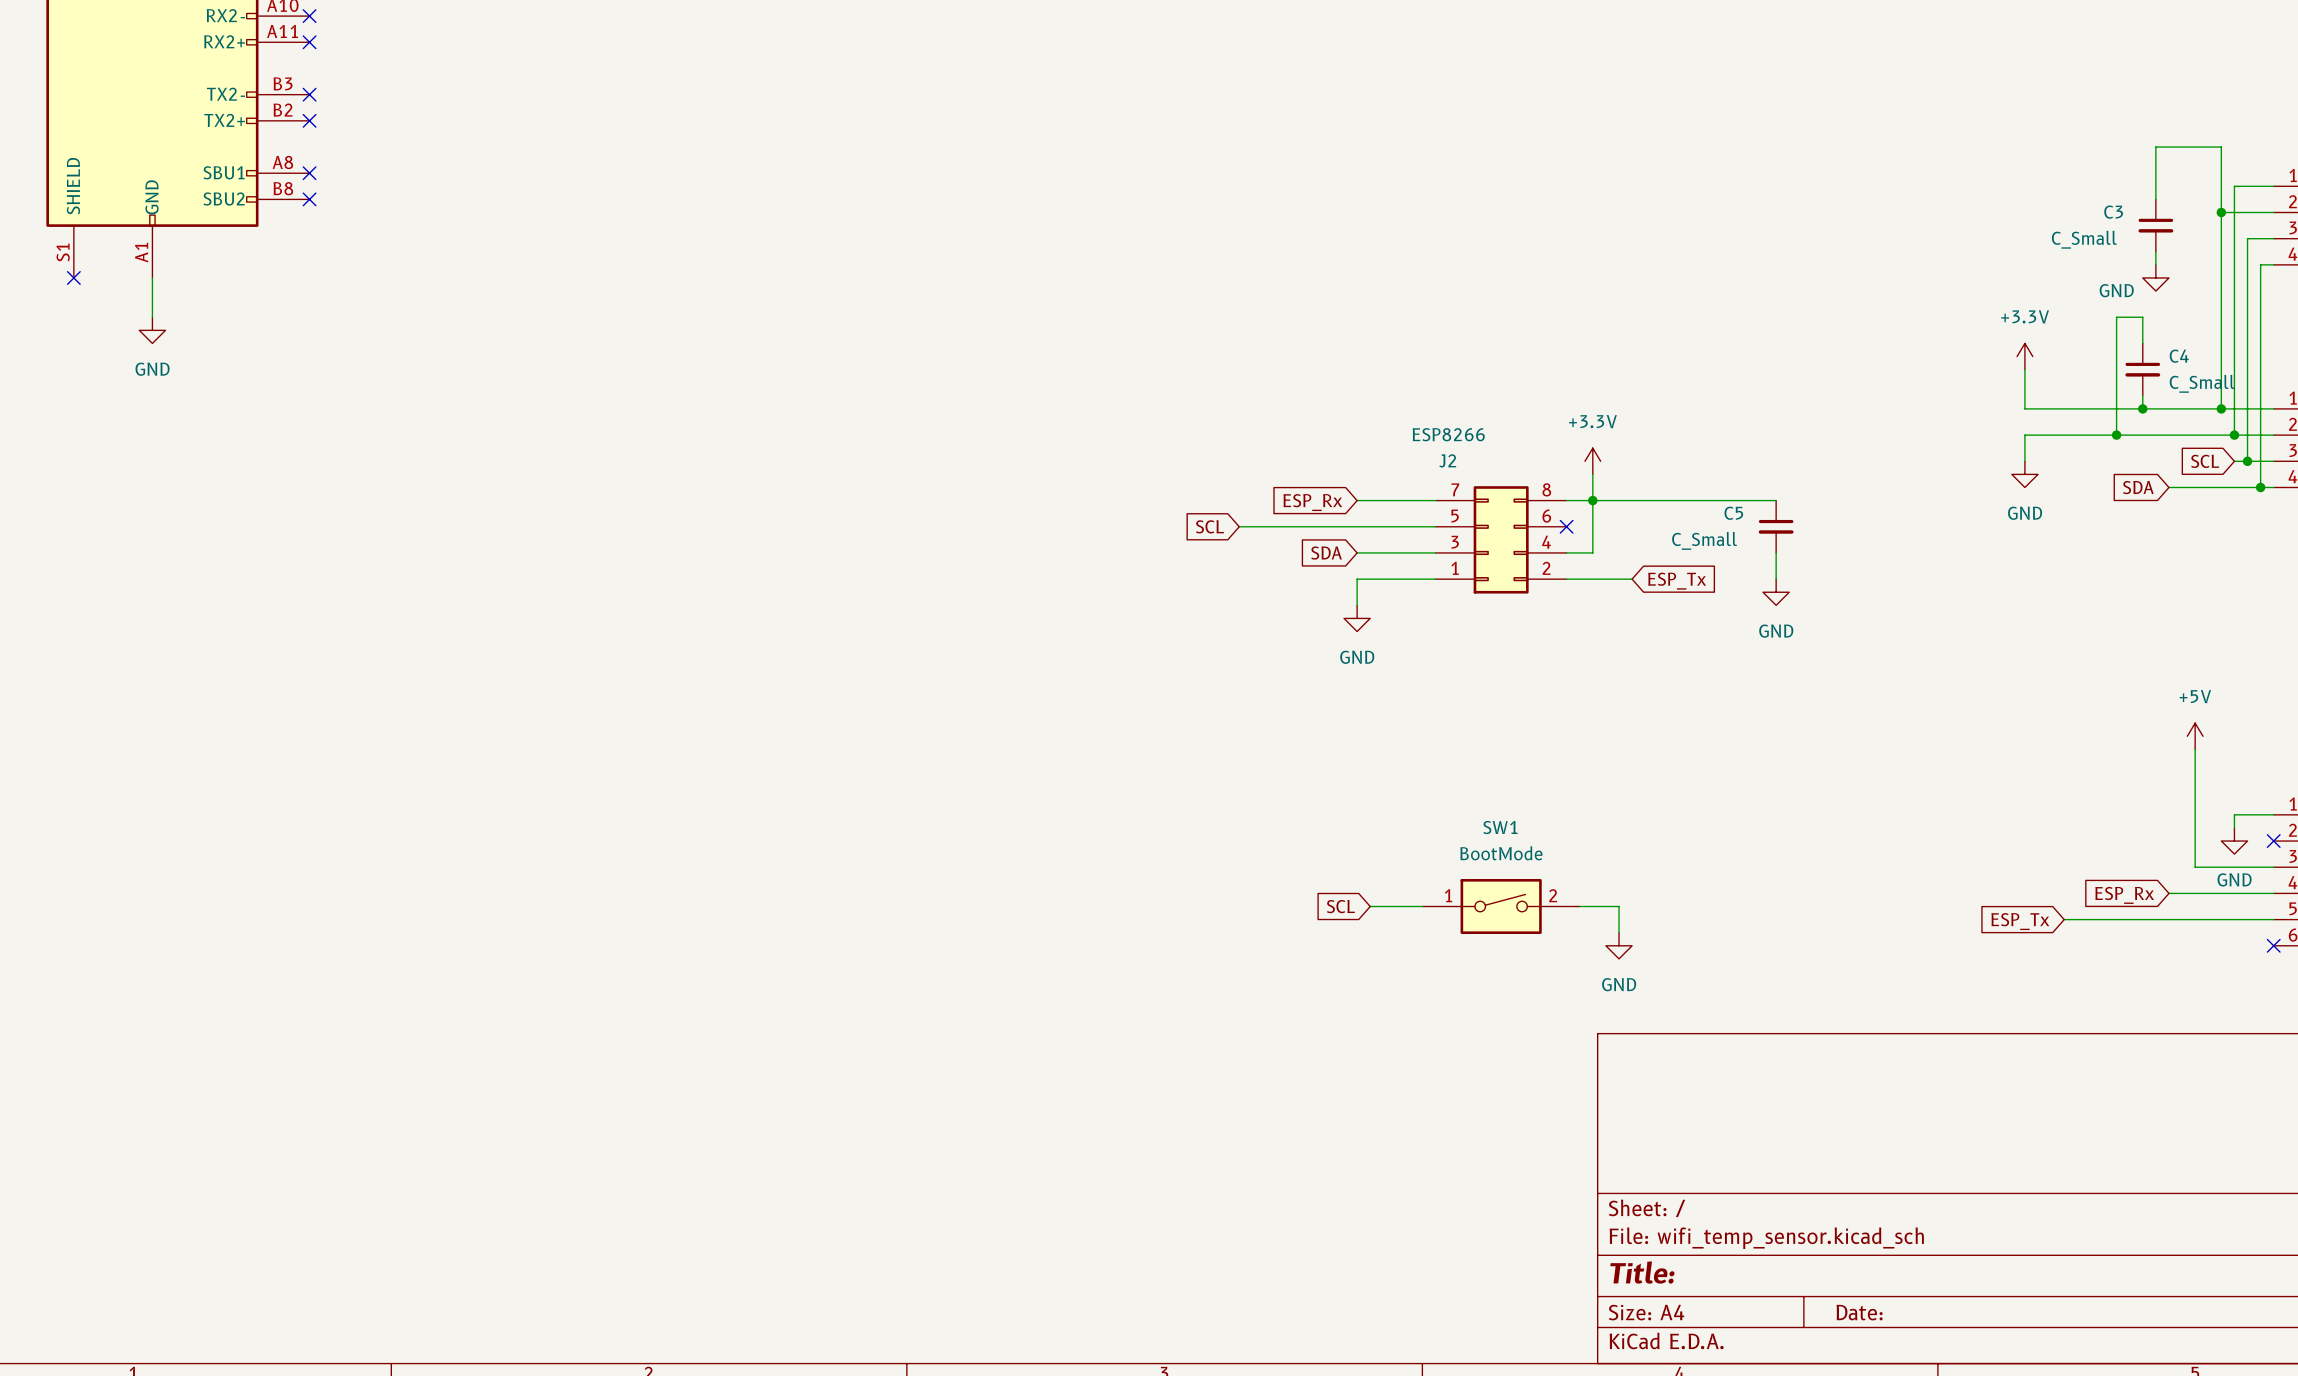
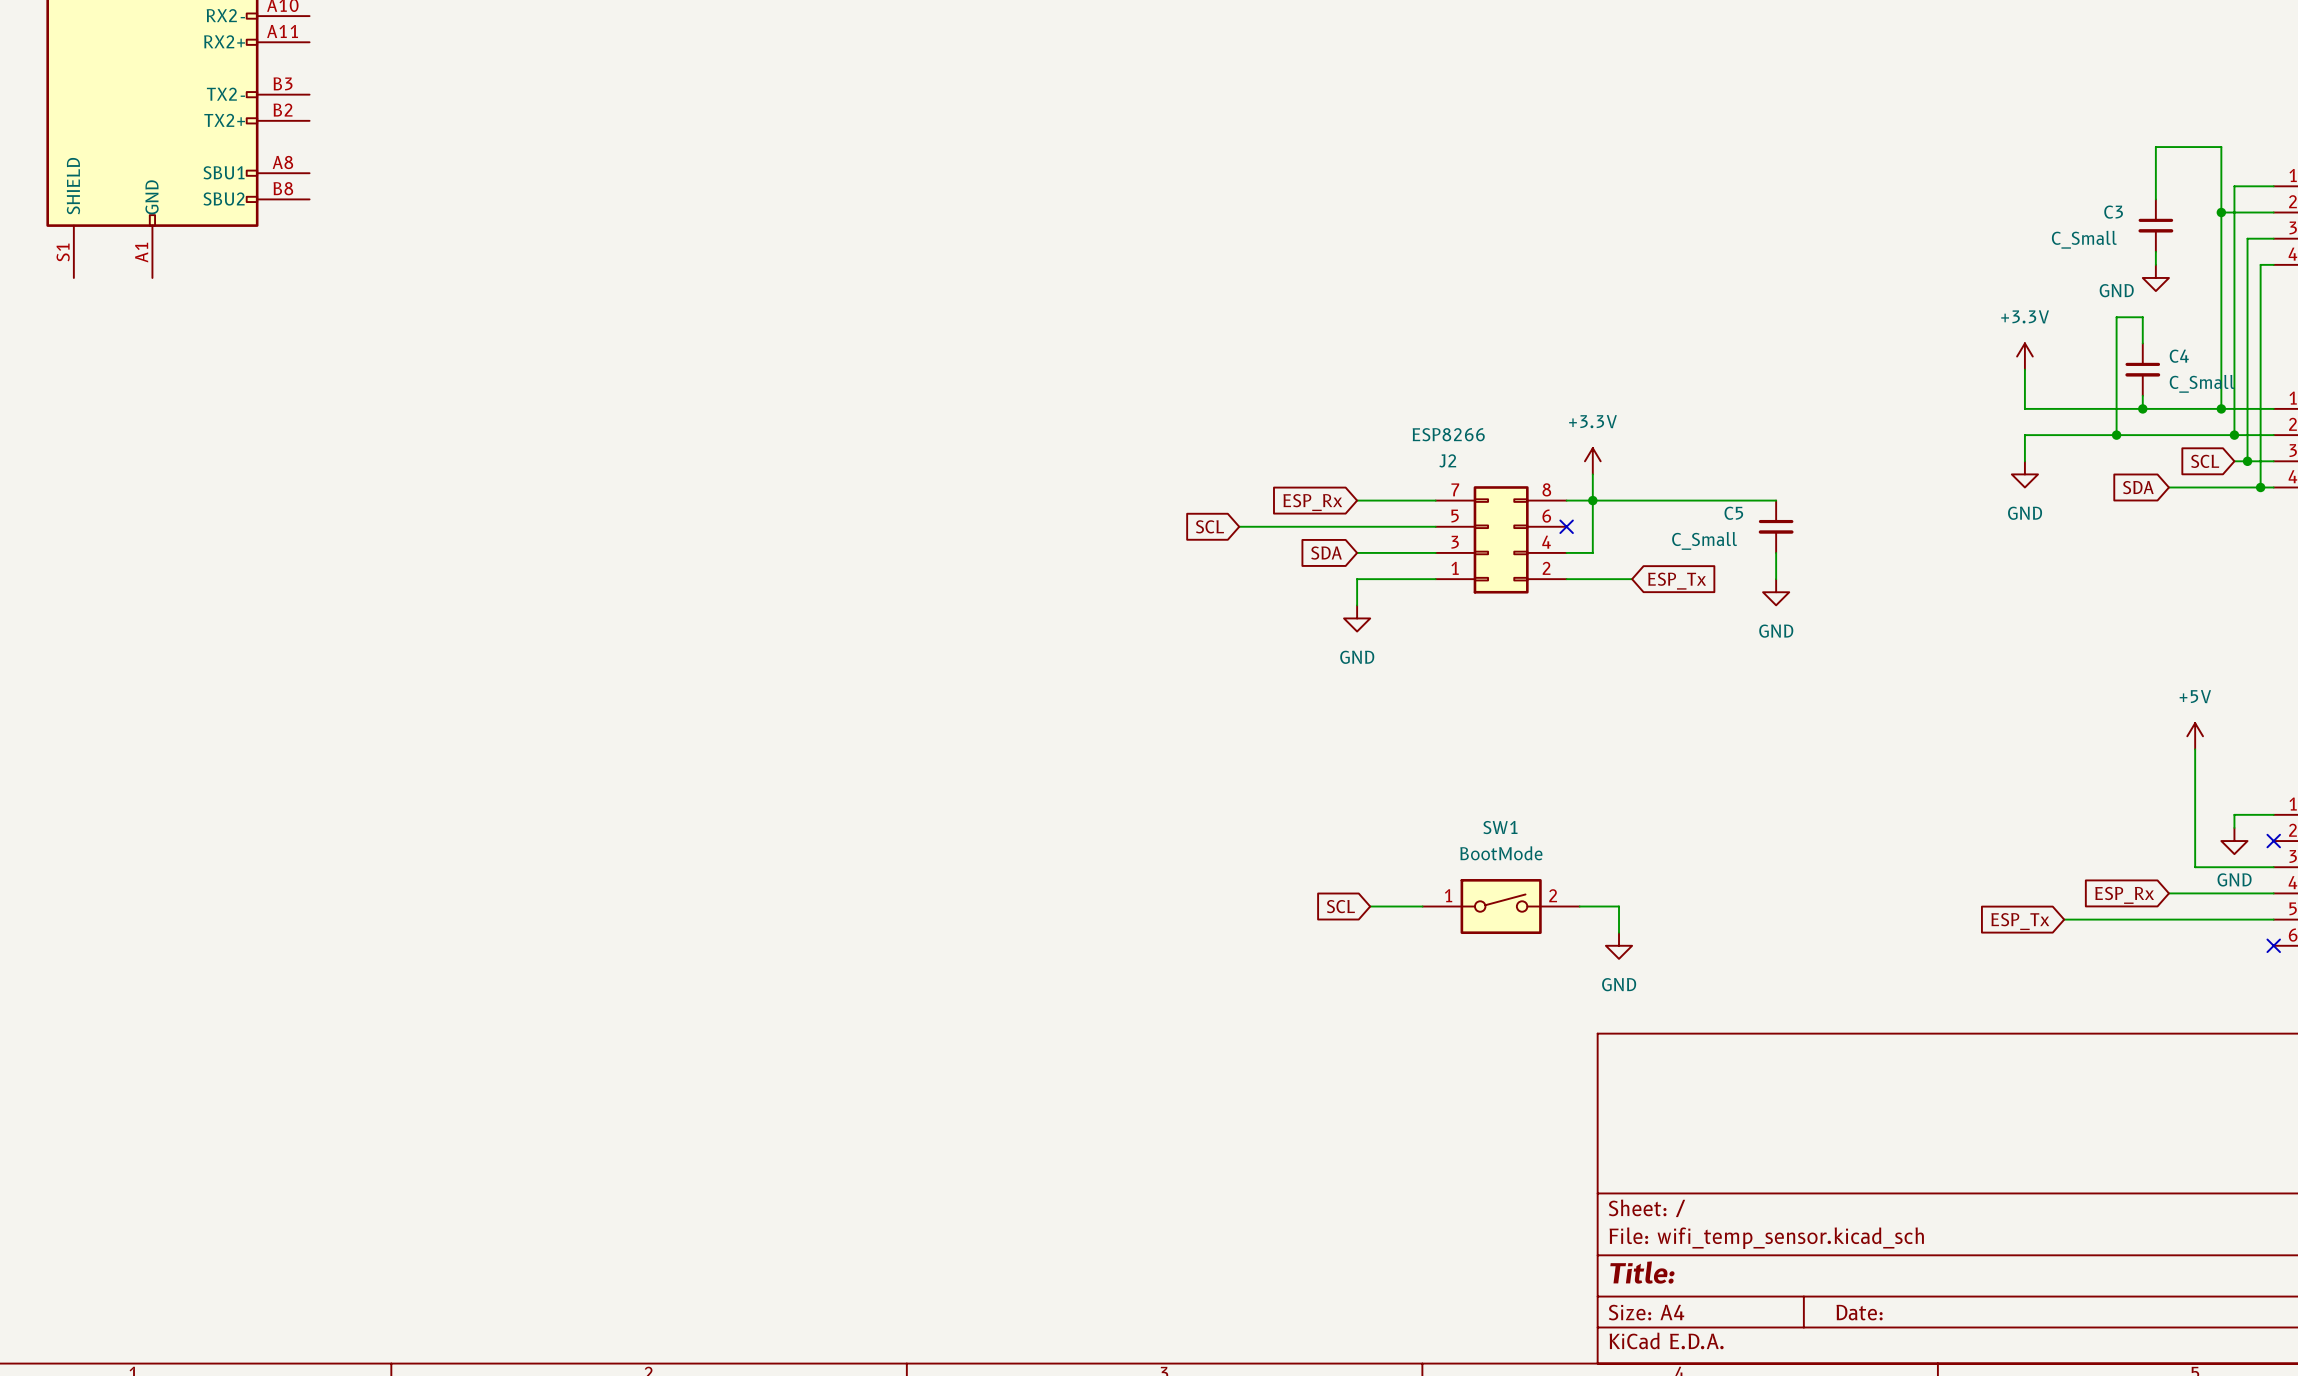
no-connect mark: (309, 16) -> none
no-connect mark: (309, 42) -> none
no-connect mark: (309, 94) -> none
no-connect mark: (309, 120) -> none
no-connect mark: (309, 173) -> none
no-connect mark: (309, 199) -> none
no-connect mark: (73, 277) -> none
wire: (152, 277) (152, 317) -> none
power symbol: GND (152, 330) -> none

